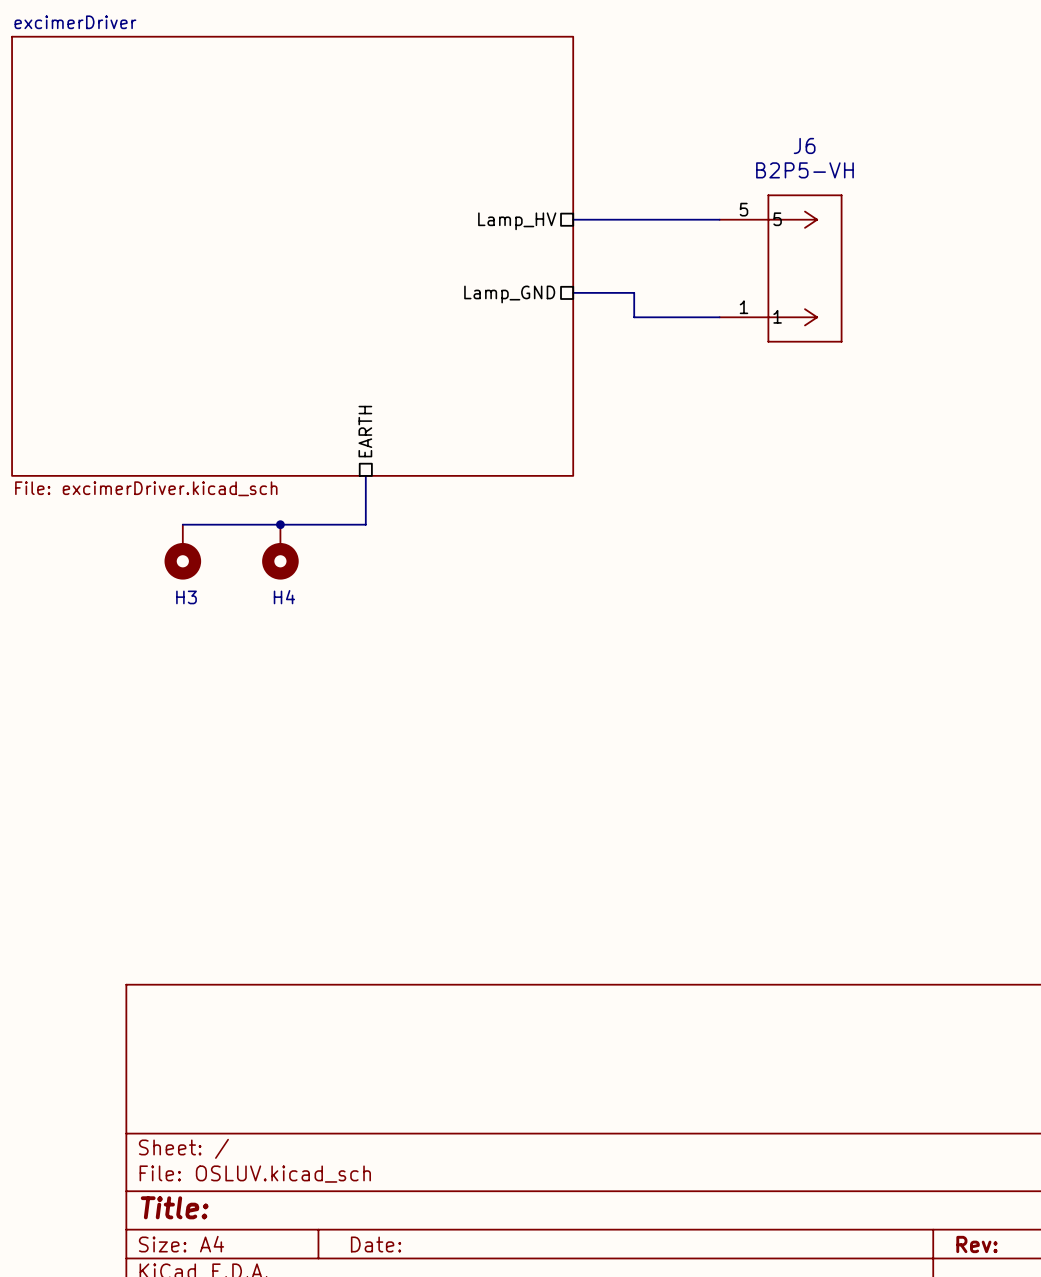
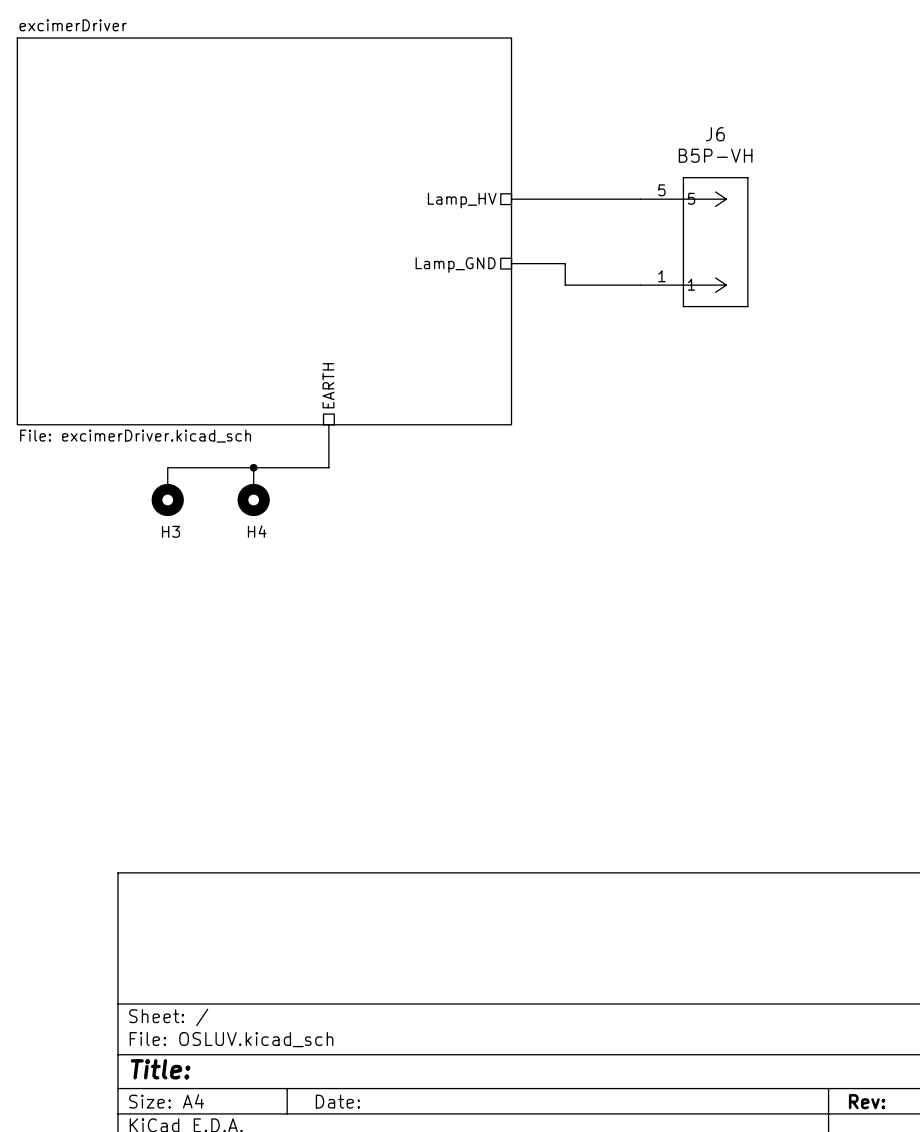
J6 value: B2P5-VH (804, 170) -> B5P-VH (715, 155)

